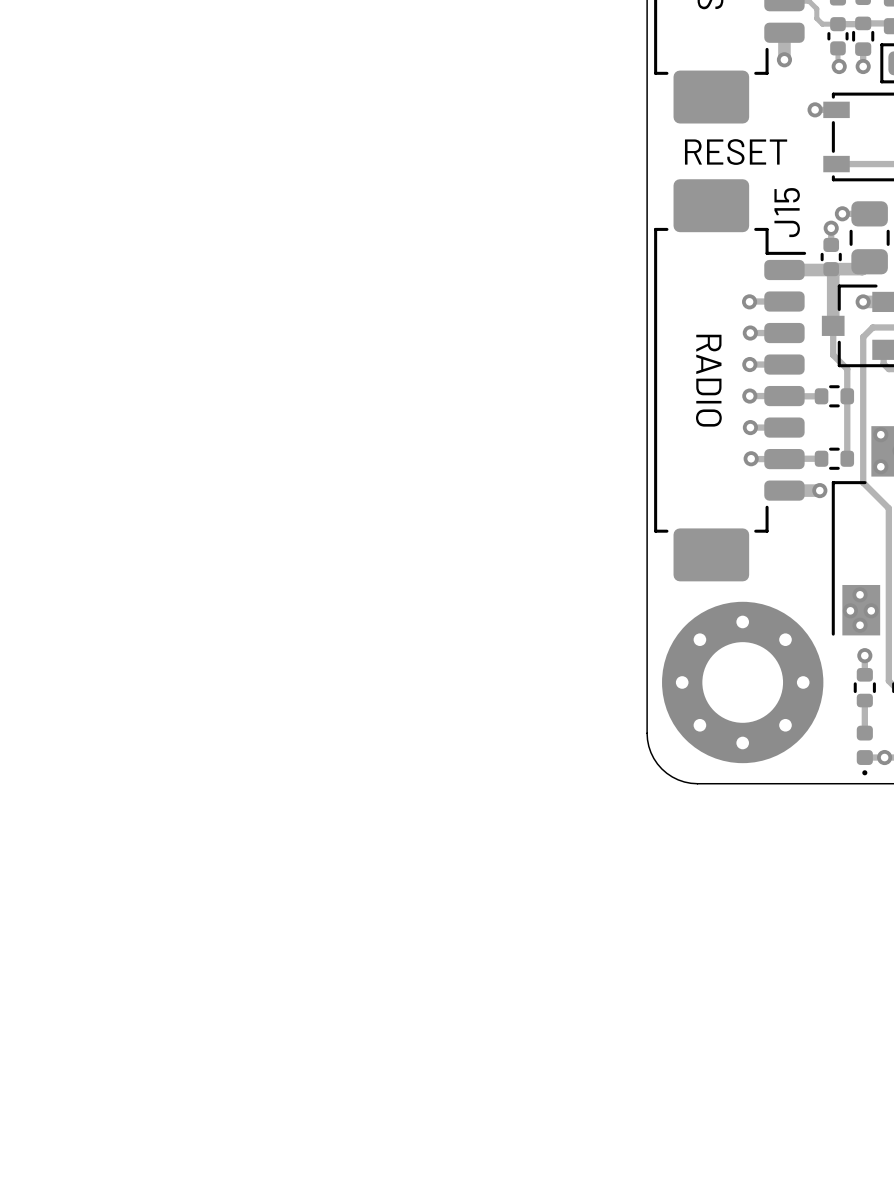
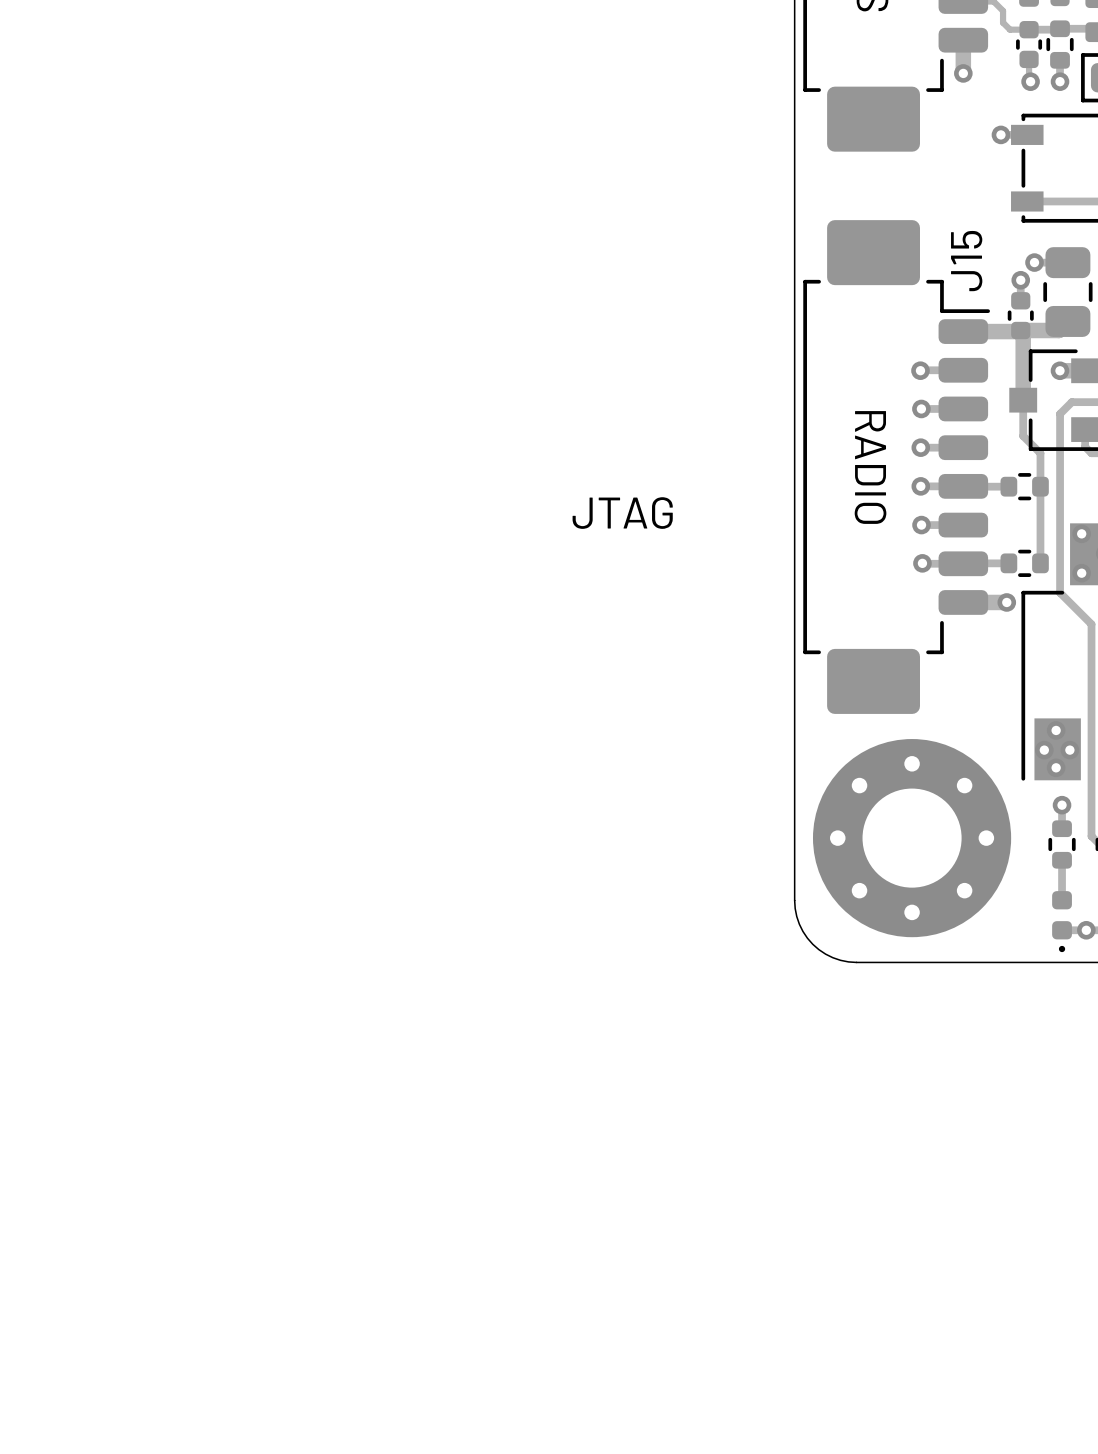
text: RESET (736, 152) -> none
text: none -> JTAG (622, 513)

